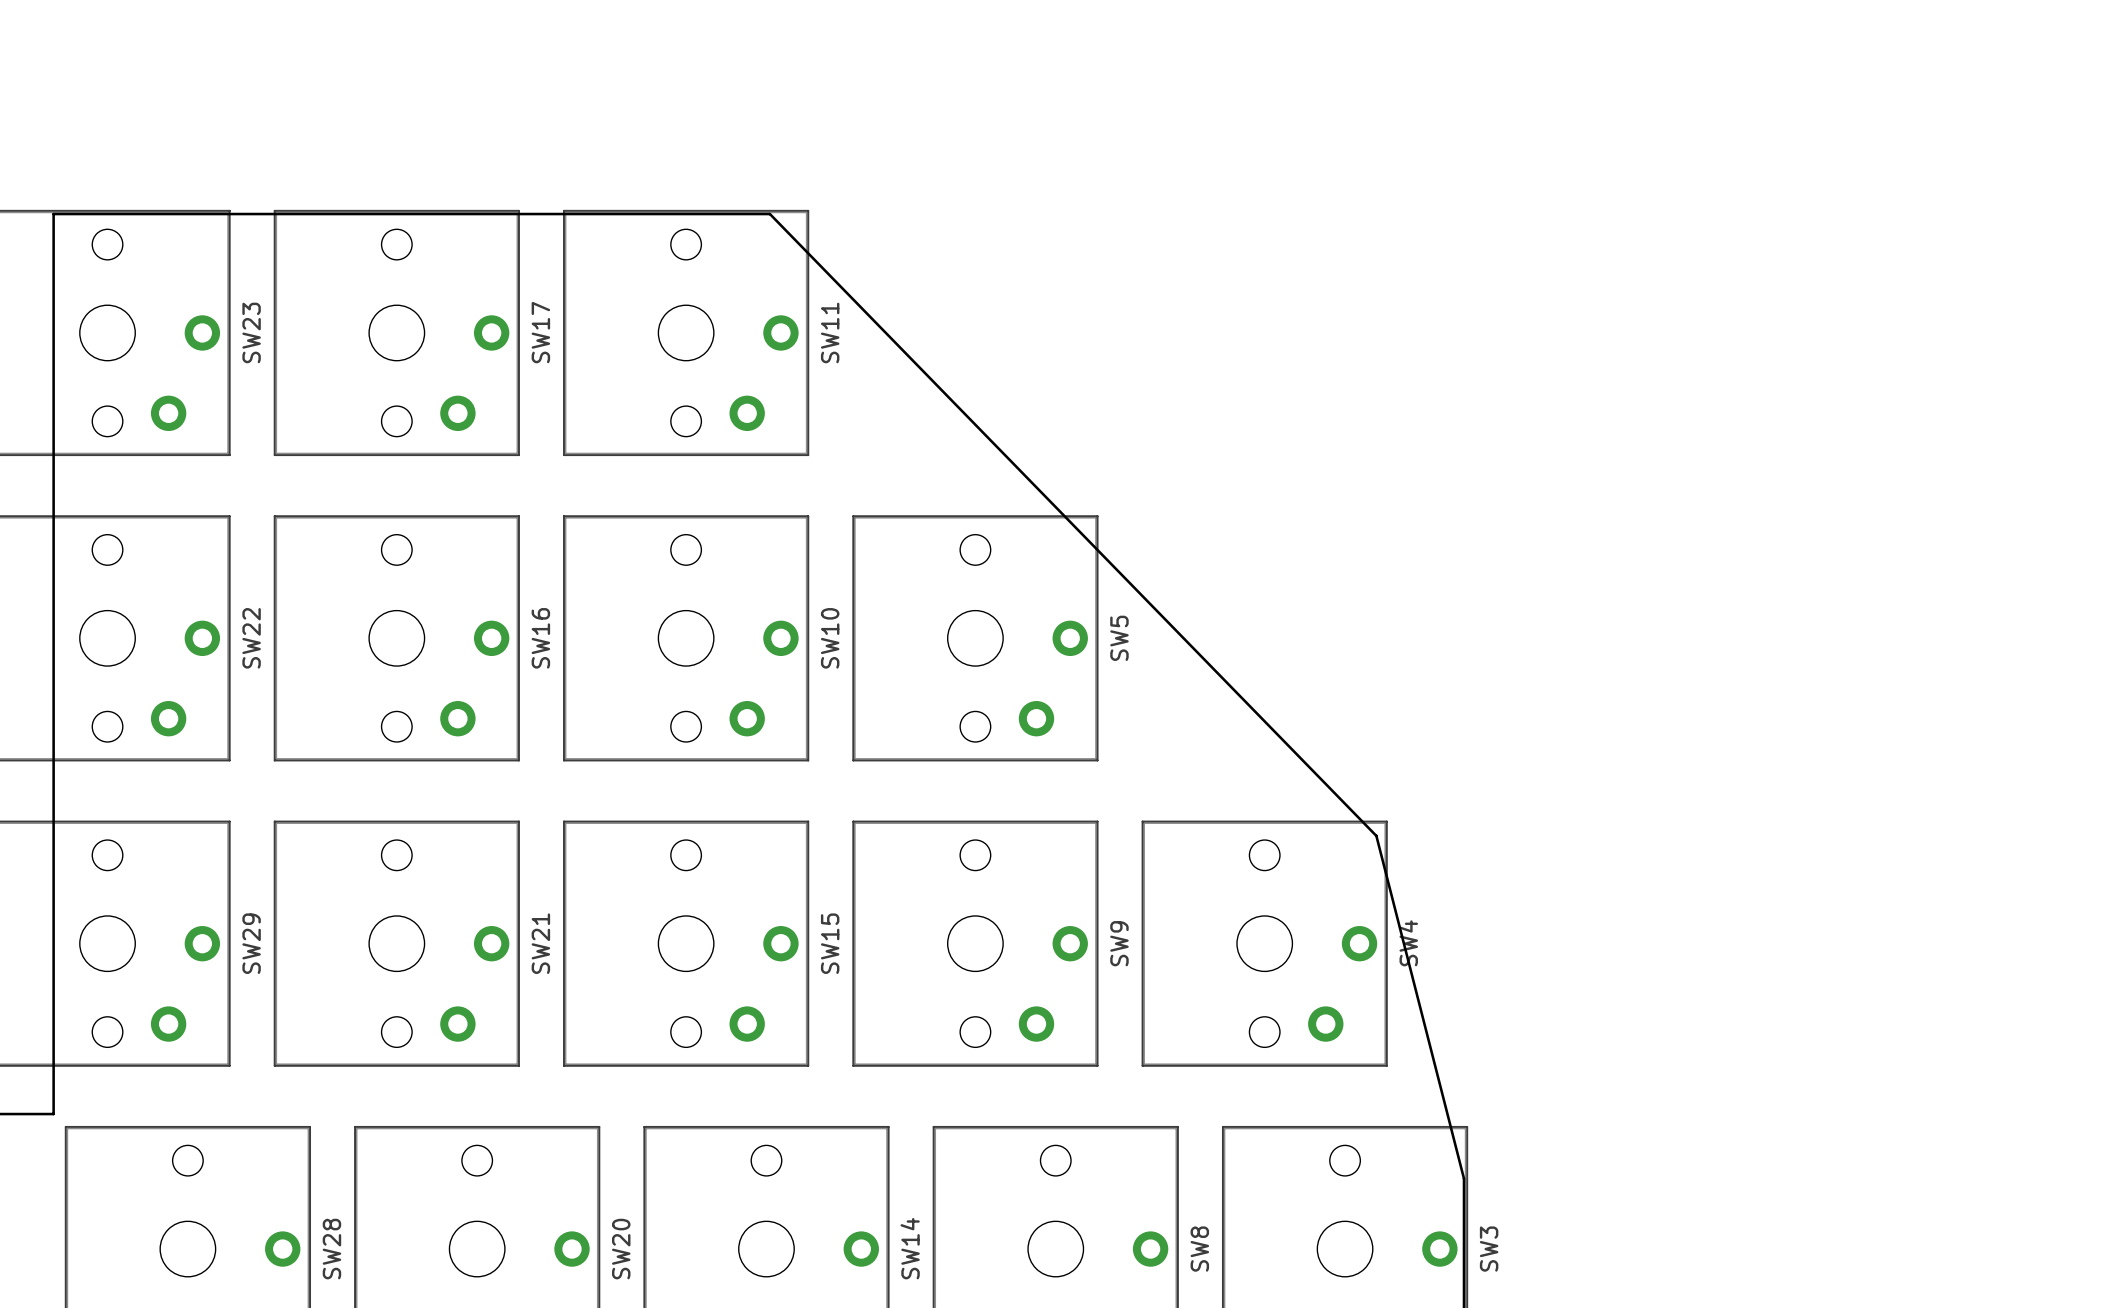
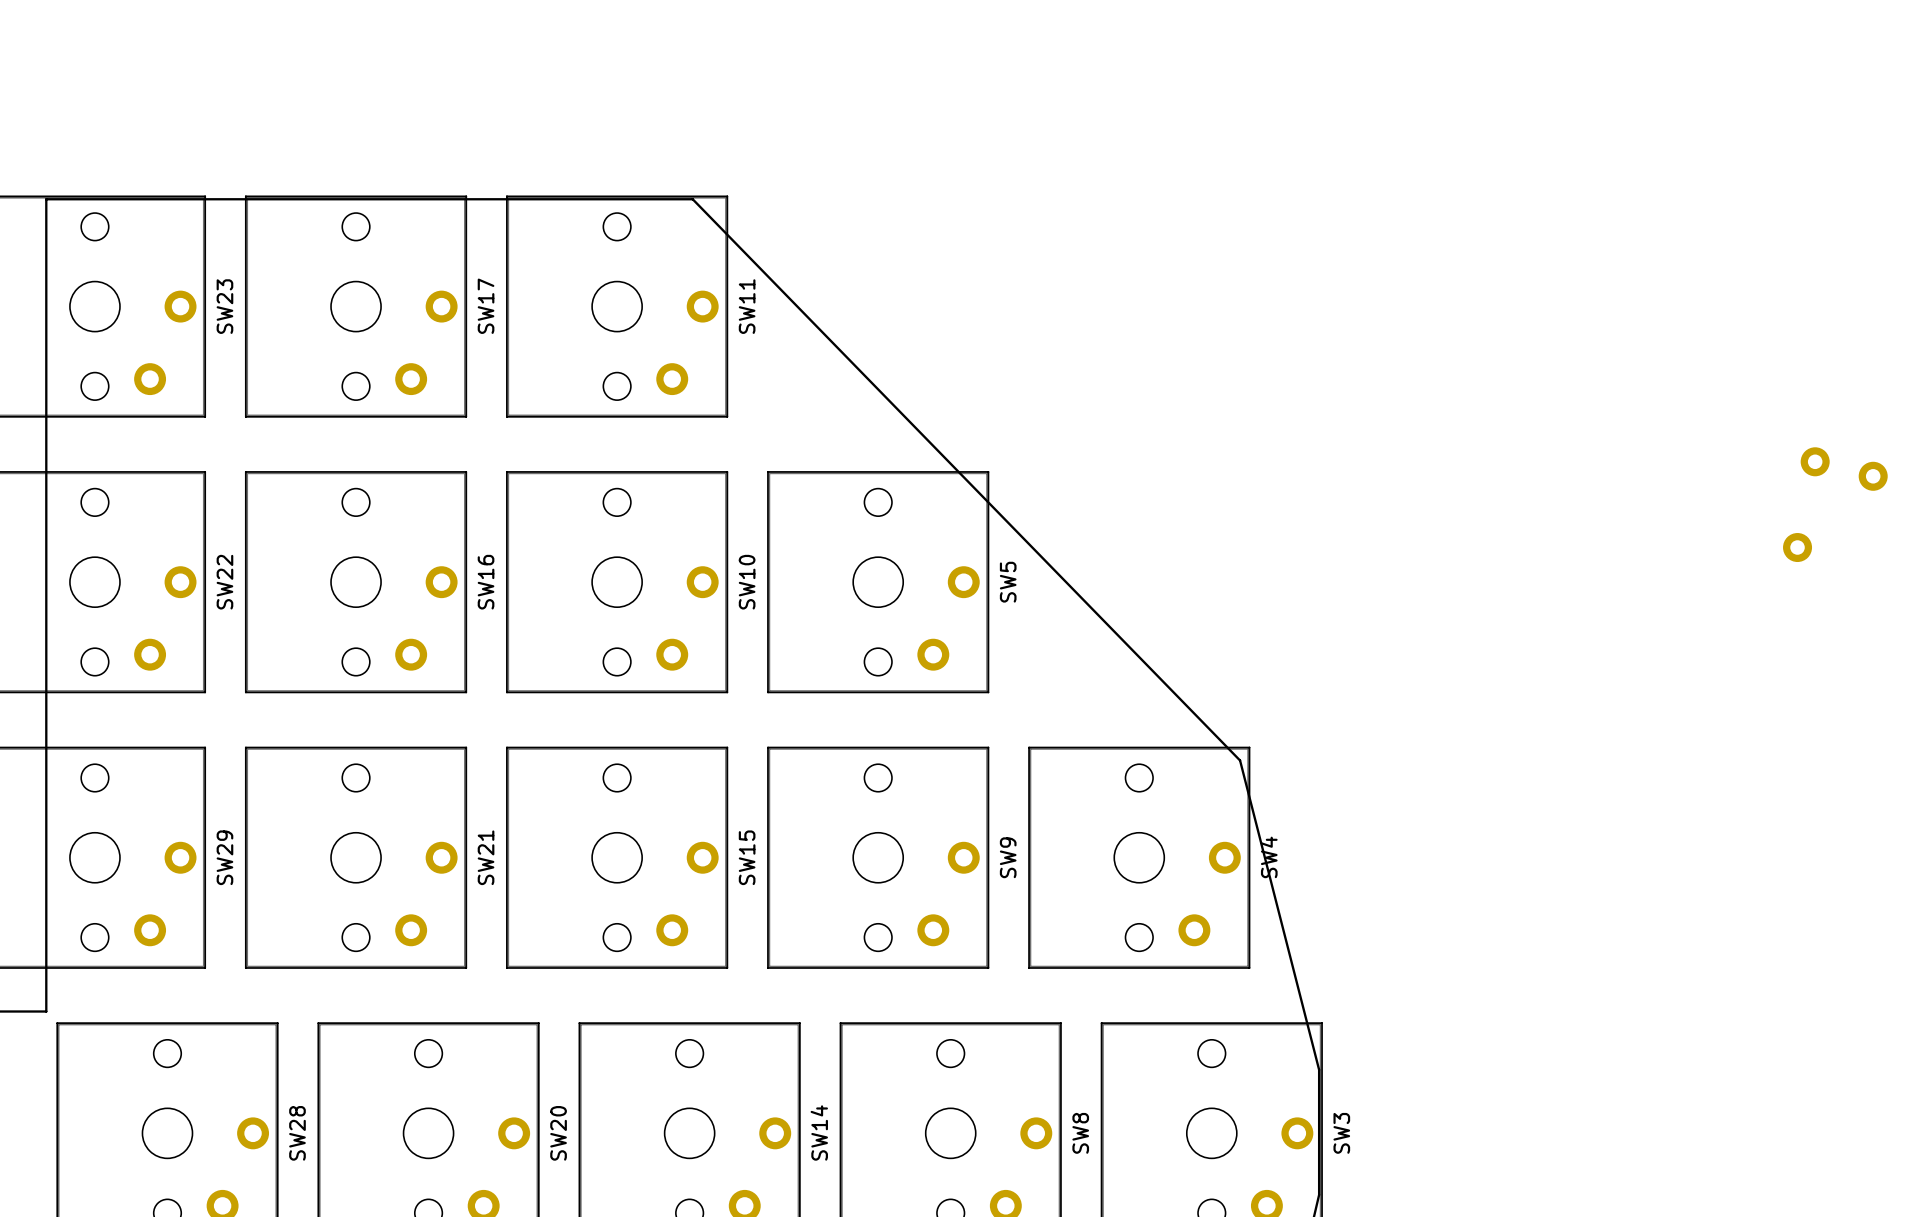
part: none -> (1815, 461)
part: none -> (1873, 476)
part: none -> (1797, 547)

